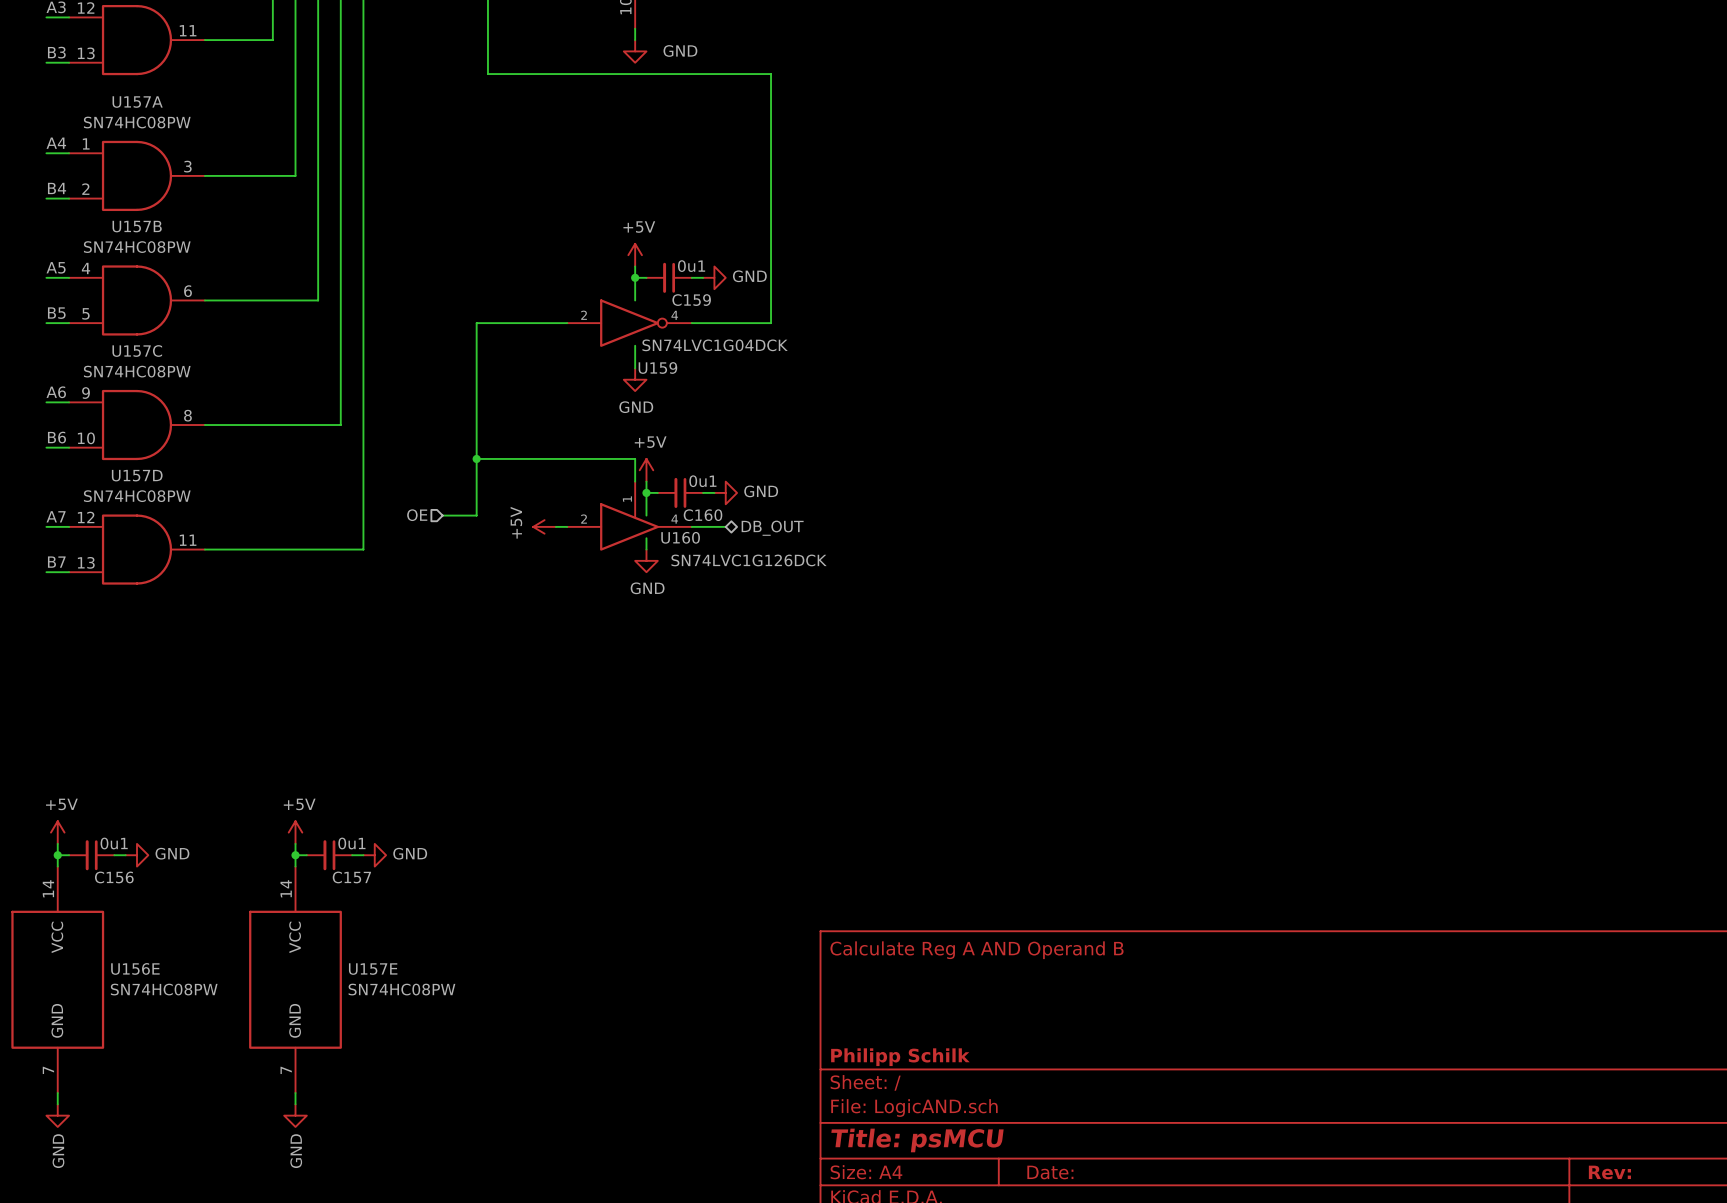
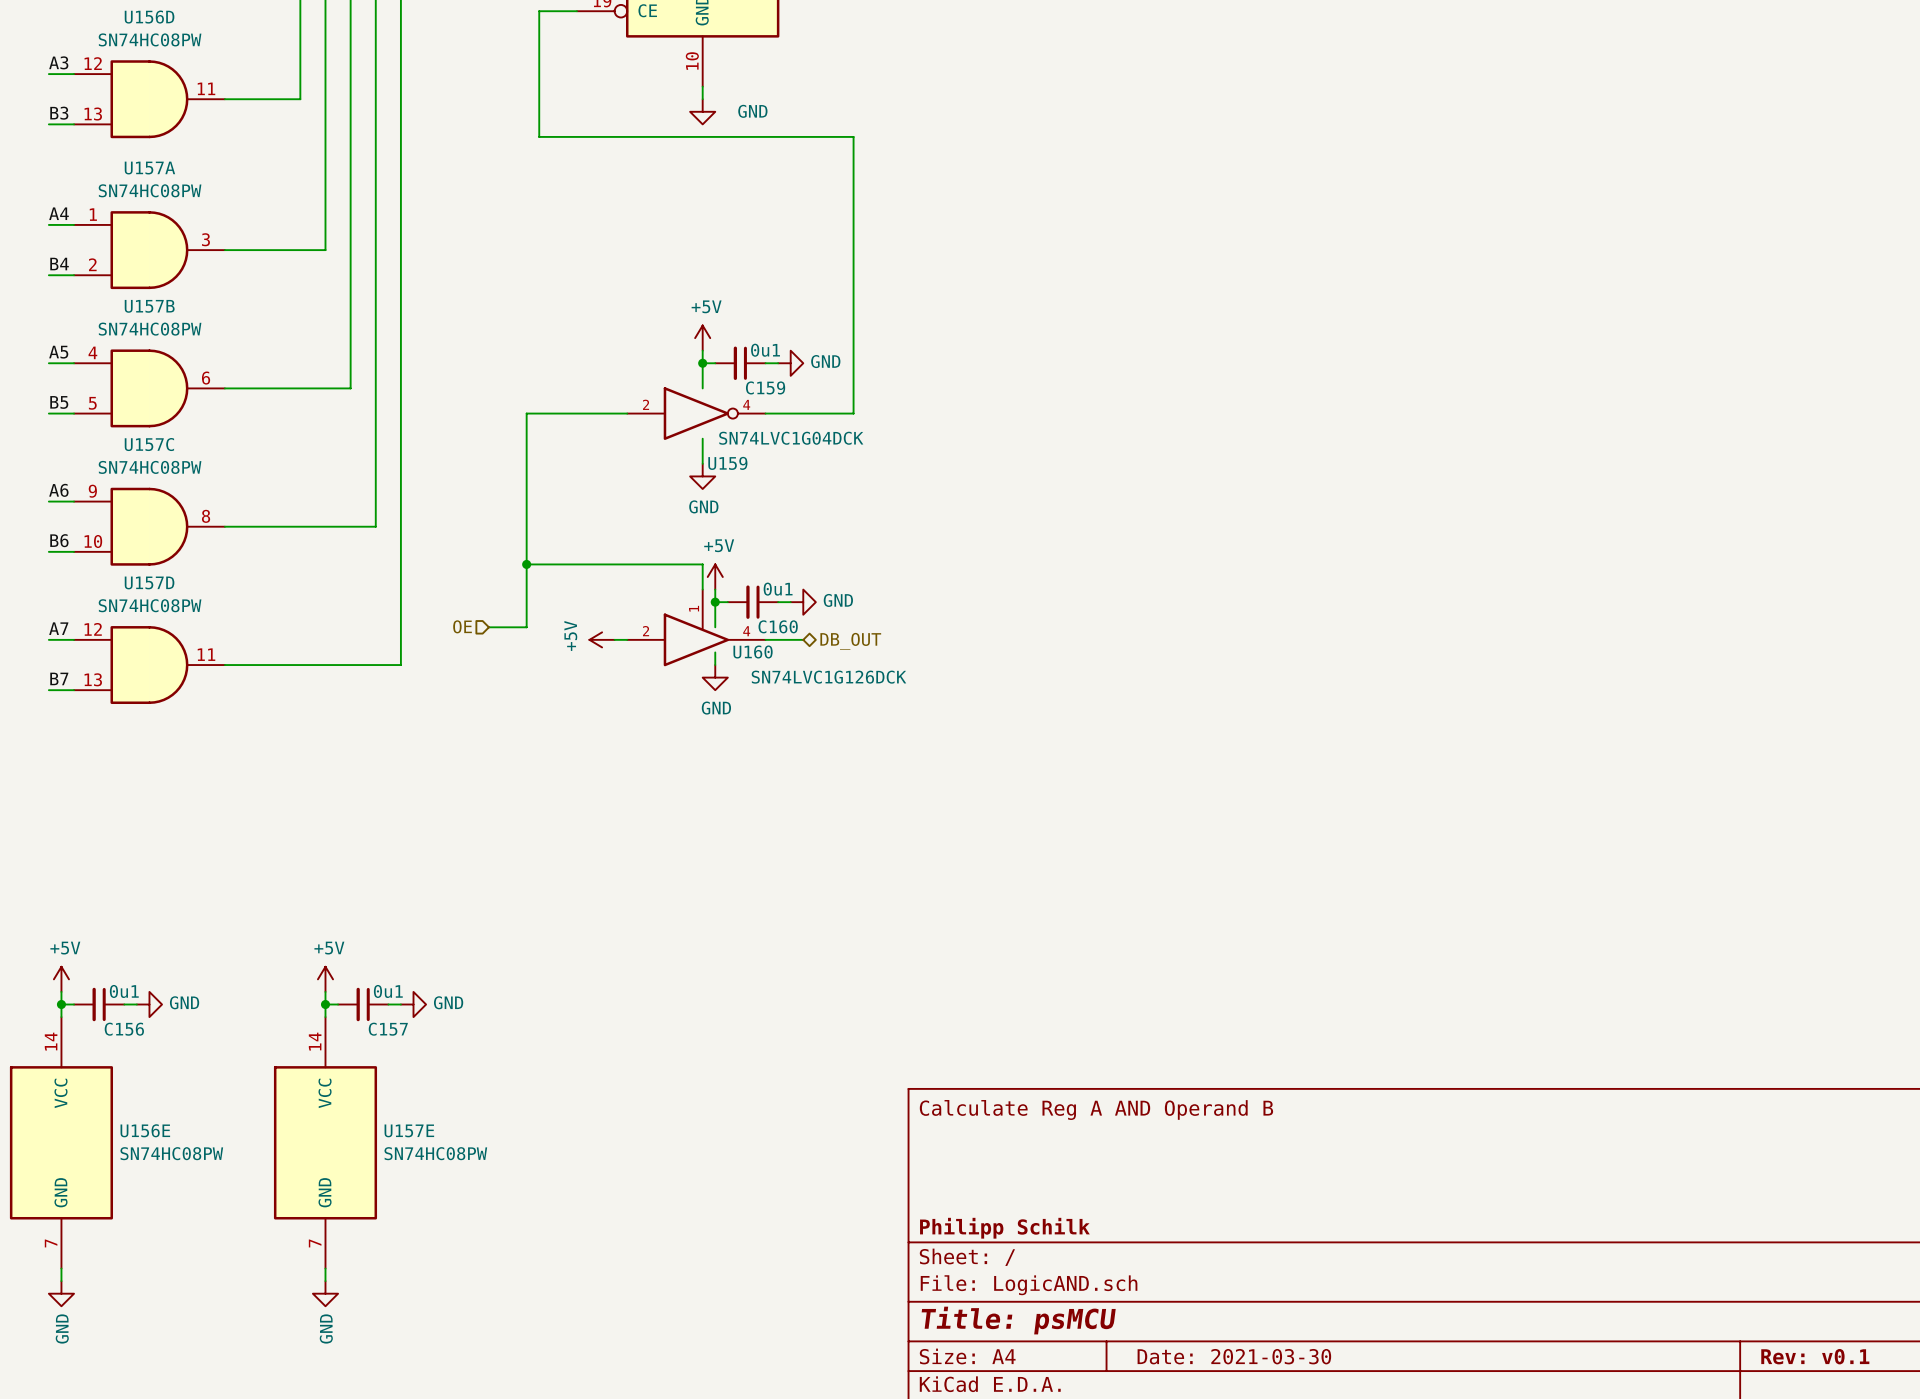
title block: Date: (1050, 1172) -> Date: 2021-03-30 (1234, 1356)
title block: Rev: (1609, 1172) -> Rev: v0.1 (1815, 1356)

